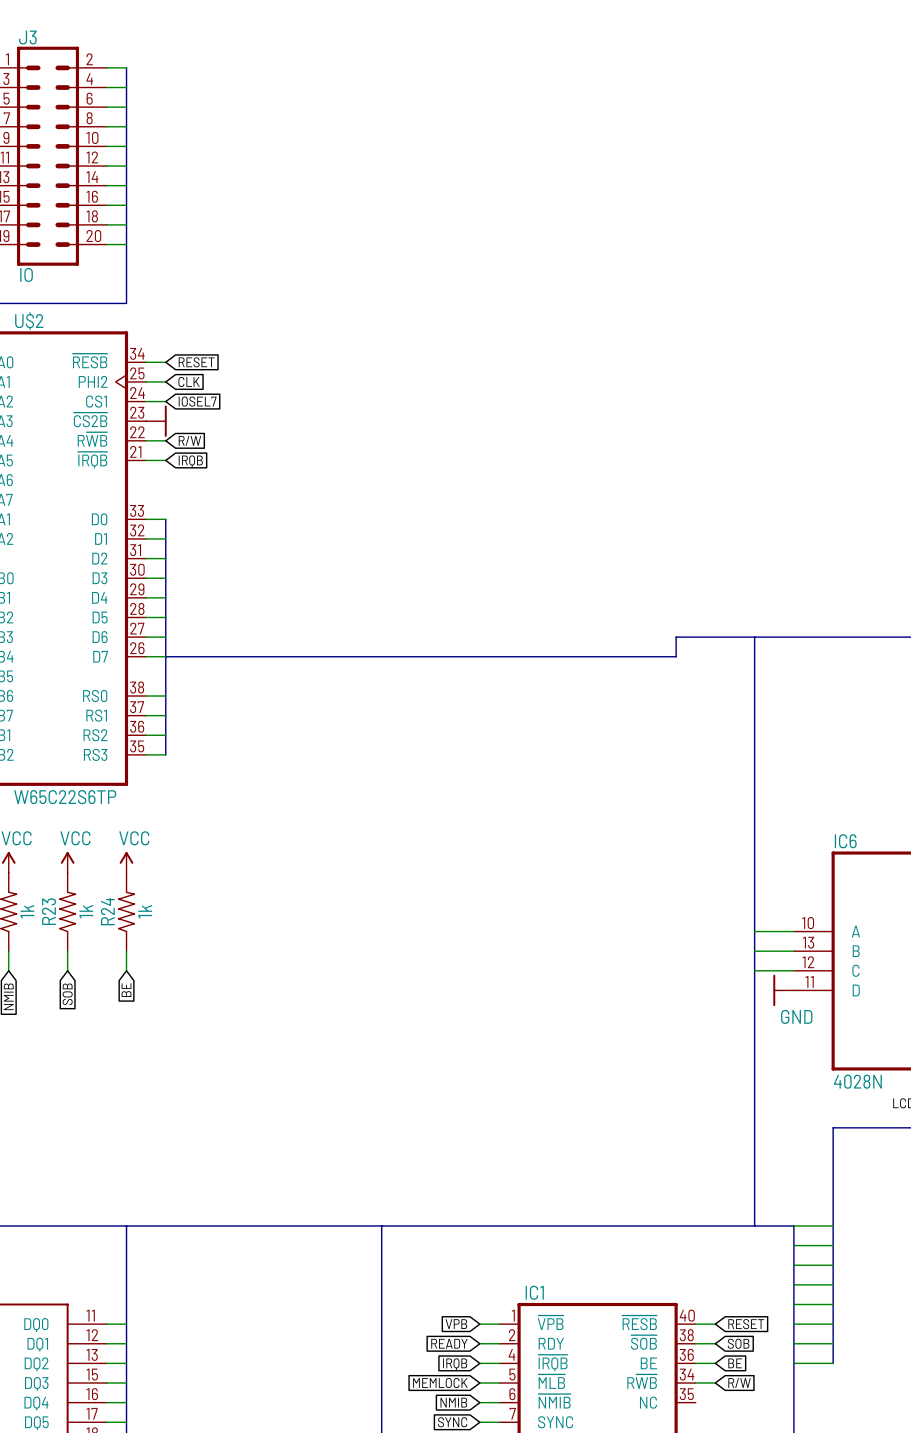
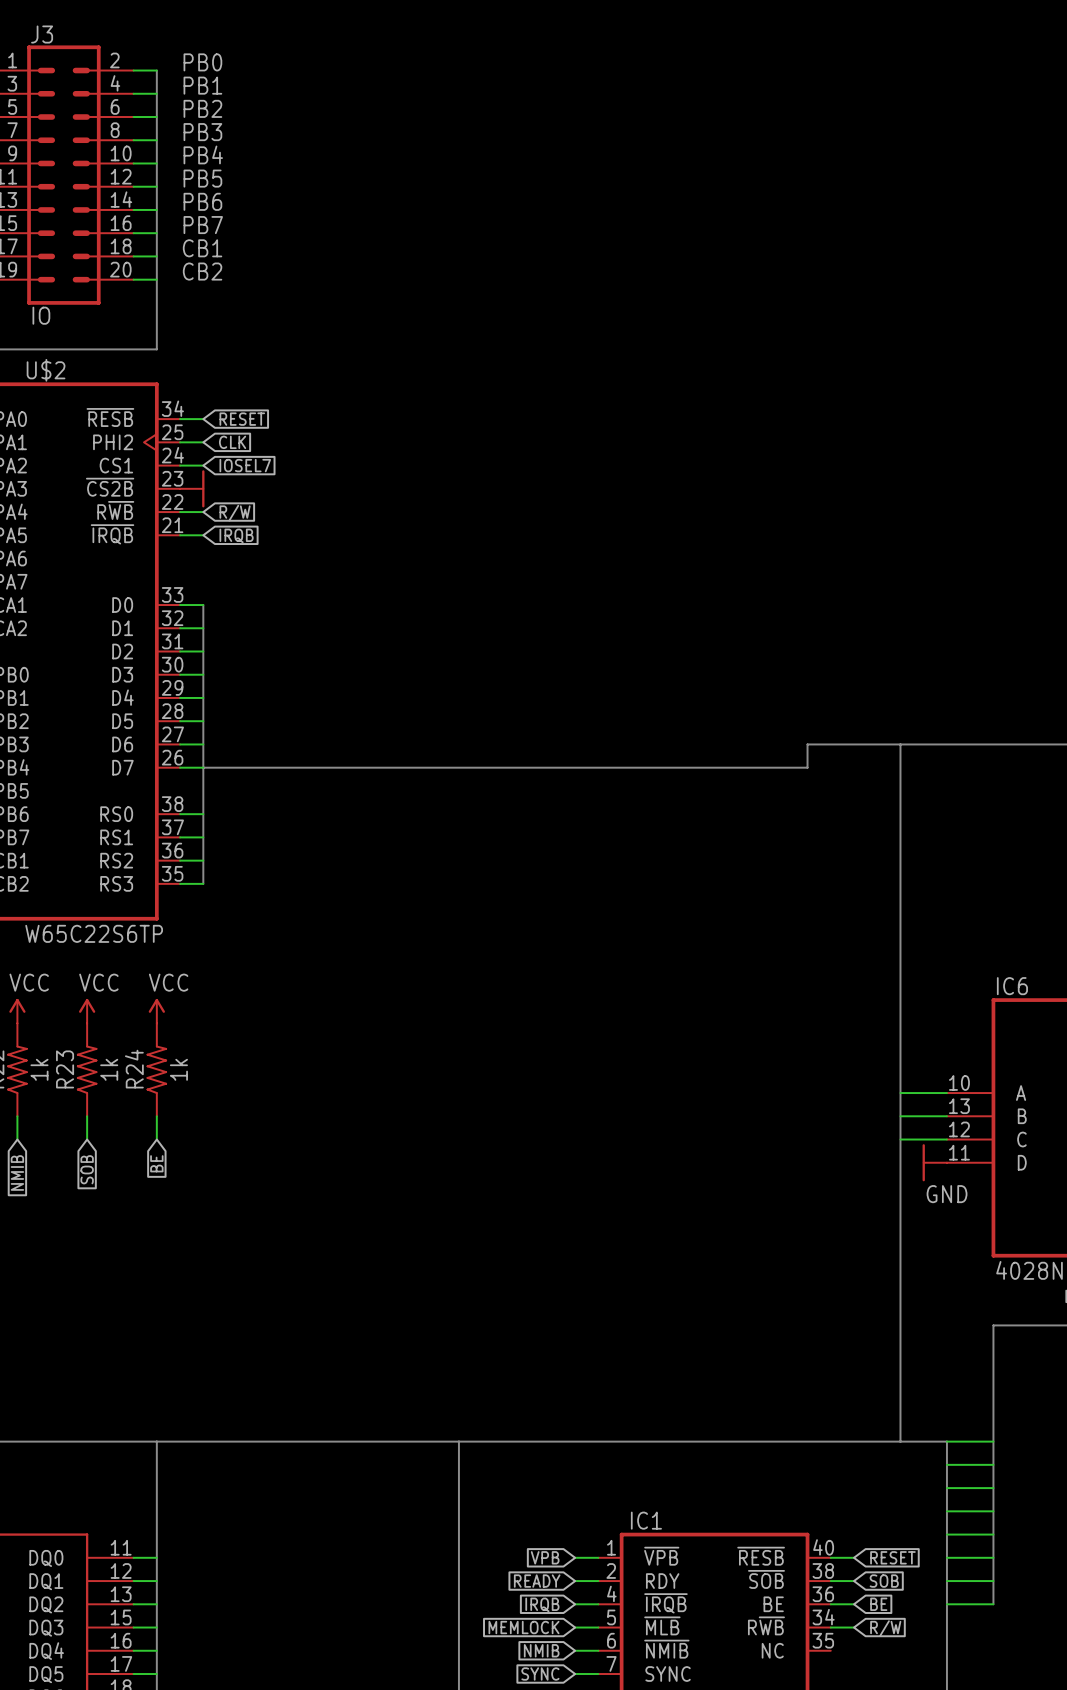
label: none -> PB0 (202, 62)
label: none -> PB1 (202, 85)
label: none -> PB2 (202, 108)
label: none -> PB3 (202, 132)
label: none -> PB4 (203, 154)
label: none -> PB5 (202, 178)
label: none -> PB6 (202, 201)
label: none -> PB7 (203, 225)
label: none -> CB1 (202, 248)
label: none -> CB2 (202, 271)

